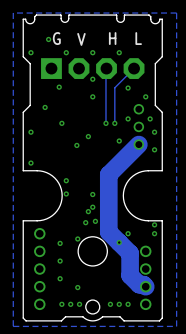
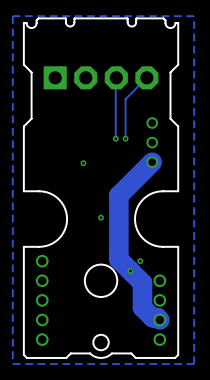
text: G (56, 38) -> none
text: H (112, 38) -> none
text: L (138, 38) -> none
via: (48, 39) -> none
text: V (81, 39) -> none
via: (30, 52) -> none
via: (66, 52) -> none
via: (92, 52) -> none
via: (119, 52) -> none
via: (92, 79) -> none
via: (59, 87) -> none
via: (128, 88) -> none
via: (92, 96) -> none
via: (145, 96) -> none
via: (45, 107) -> none
via: (128, 118) -> none
via: (150, 118) -> none
via: (61, 123) -> none
via: (30, 132) -> none
via: (154, 132) -> none
via: (88, 136) -> none
via: (119, 141) -> none
via: (154, 149) -> none
via: (30, 163) -> none
via: (66, 180) -> none
via: (66, 193) -> none
via: (92, 207) -> none
via: (88, 211) -> none
via: (95, 221) -> none
via: (85, 222) -> none
via: (154, 224) -> none
via: (154, 233) -> none
via: (77, 239) -> none
via: (60, 243) -> none
via: (60, 261) -> none
via: (60, 278) -> none
via: (77, 287) -> none
via: (61, 304) -> none
via: (70, 304) -> none
via: (79, 304) -> none
via: (110, 304) -> none
via: (119, 304) -> none
via: (128, 304) -> none

